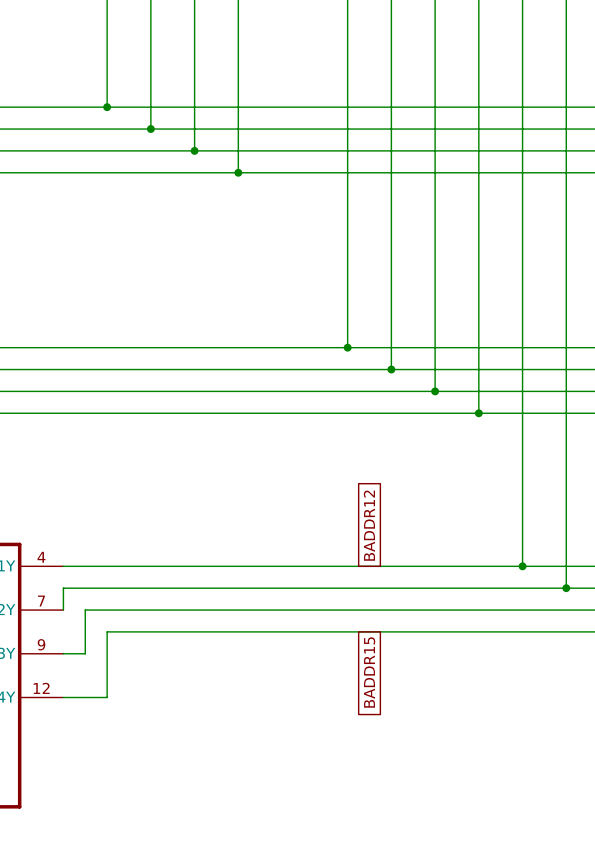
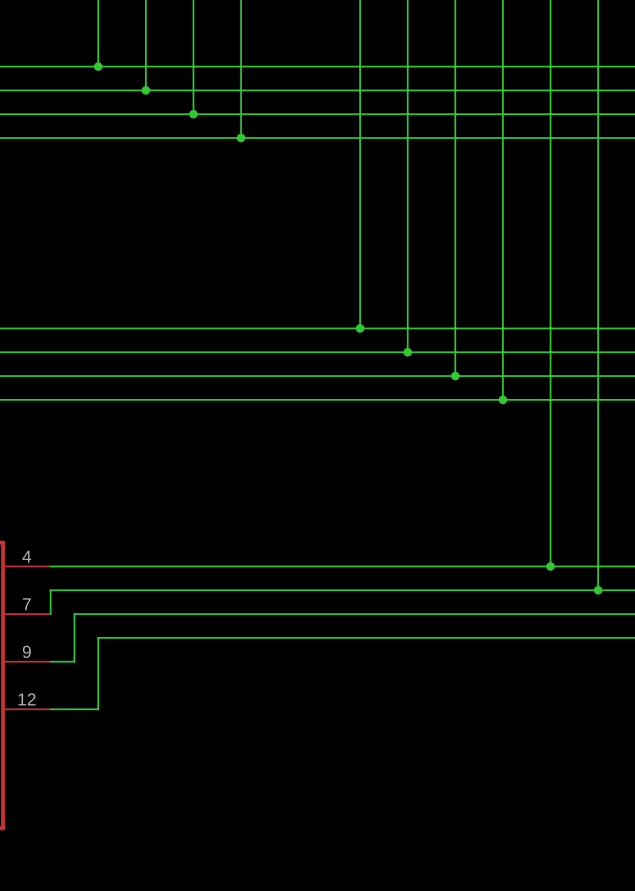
global label: BADDR12 (369, 525) -> none
global label: BADDR15 (369, 672) -> none

